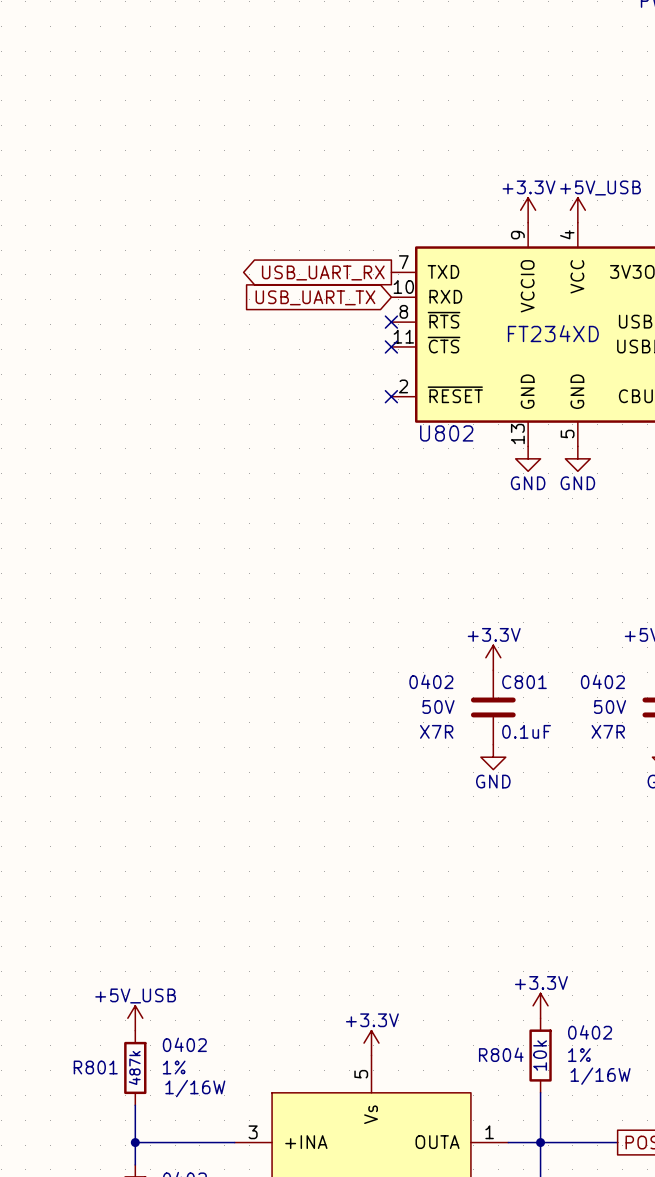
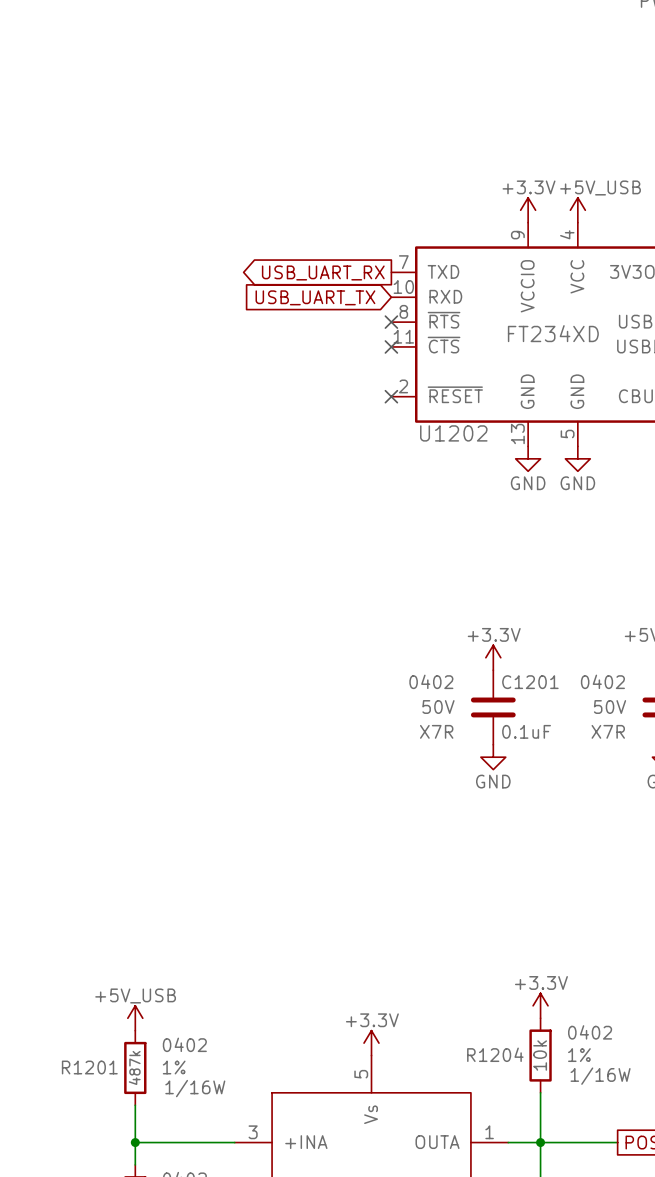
U802 name: U802 (446, 433) -> U1202 (453, 433)
C801 name: C801 (524, 682) -> C1201 (530, 682)
R804 name: R804 (501, 1054) -> R1204 (495, 1054)
R801 name: R801 (95, 1067) -> R1201 (89, 1067)

